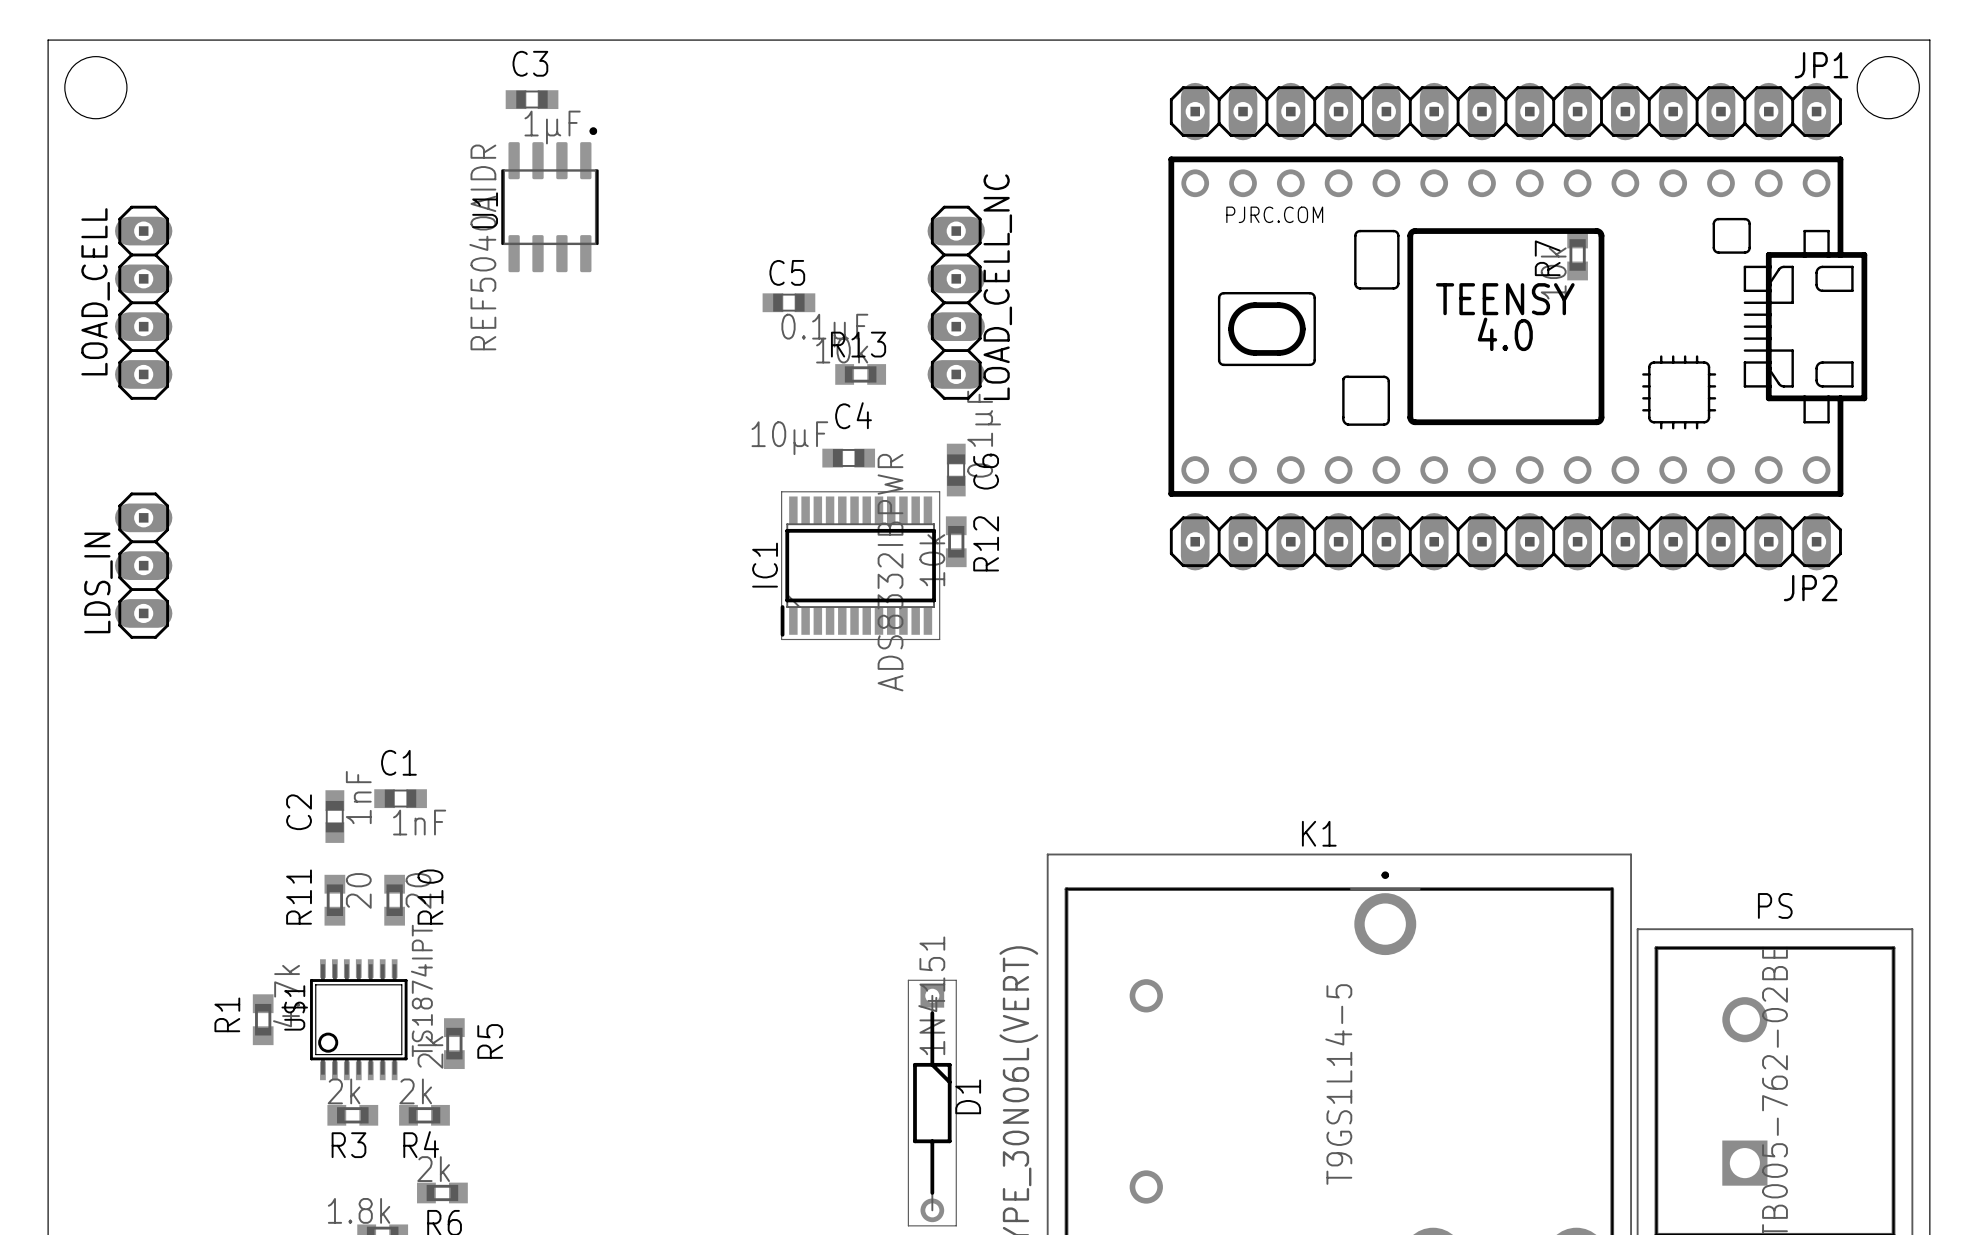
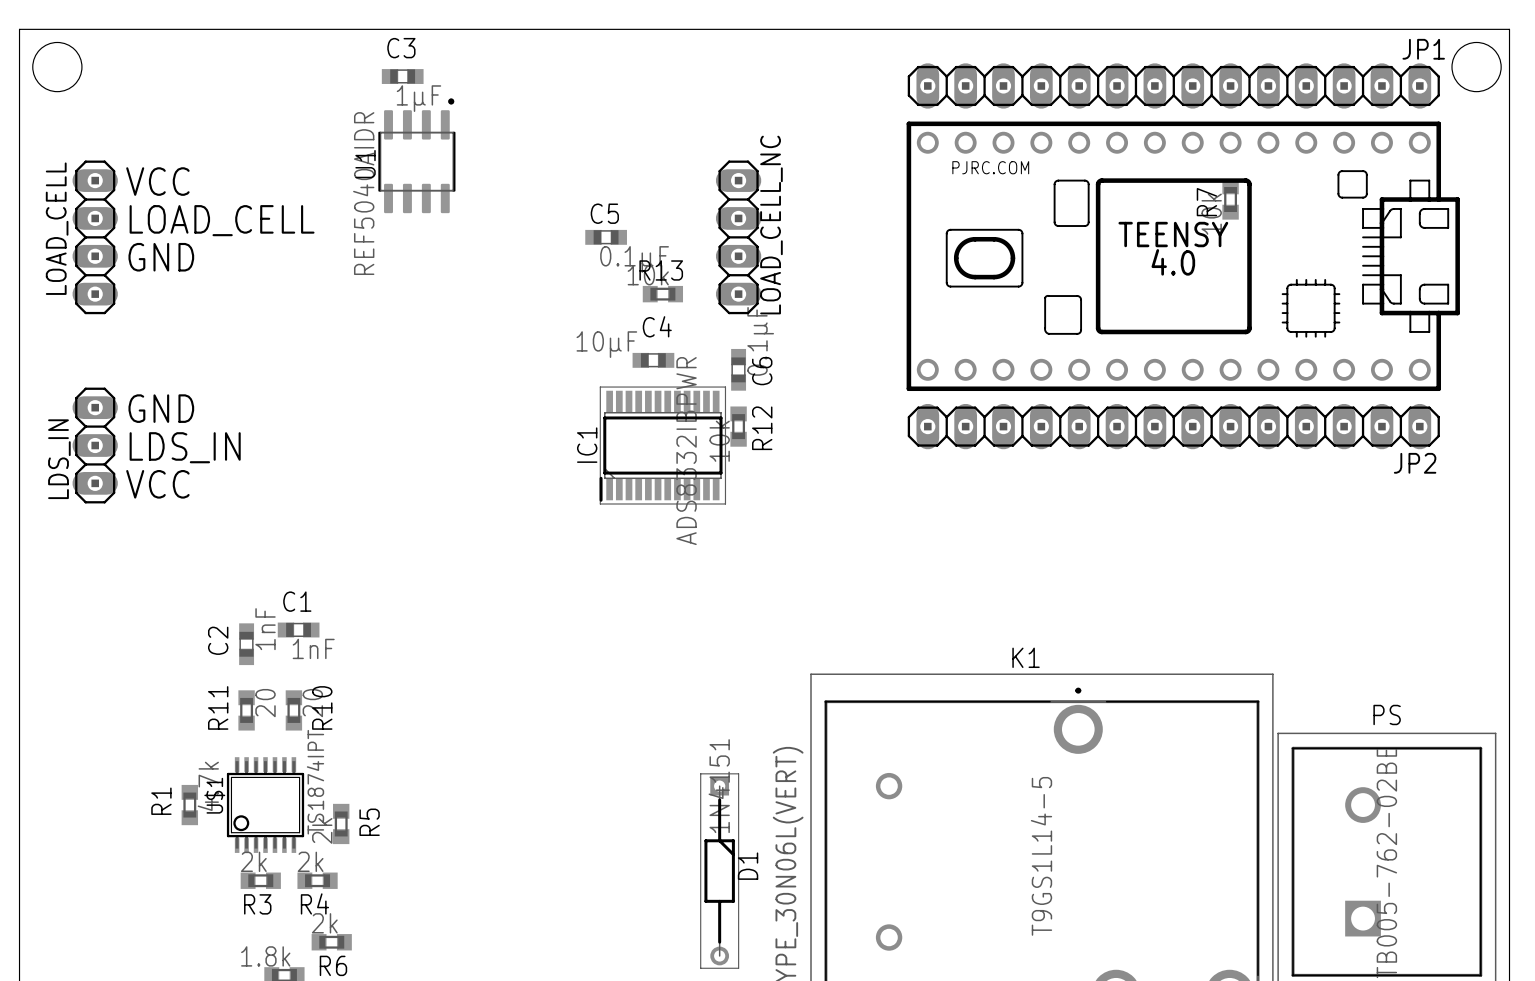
text: none -> VCC (157, 181)
text: none -> LOAD_CELL (222, 220)
text: none -> GND (161, 257)
text: none -> GND (161, 408)
text: none -> LDS_IN (185, 447)
text: none -> VCC (157, 484)

